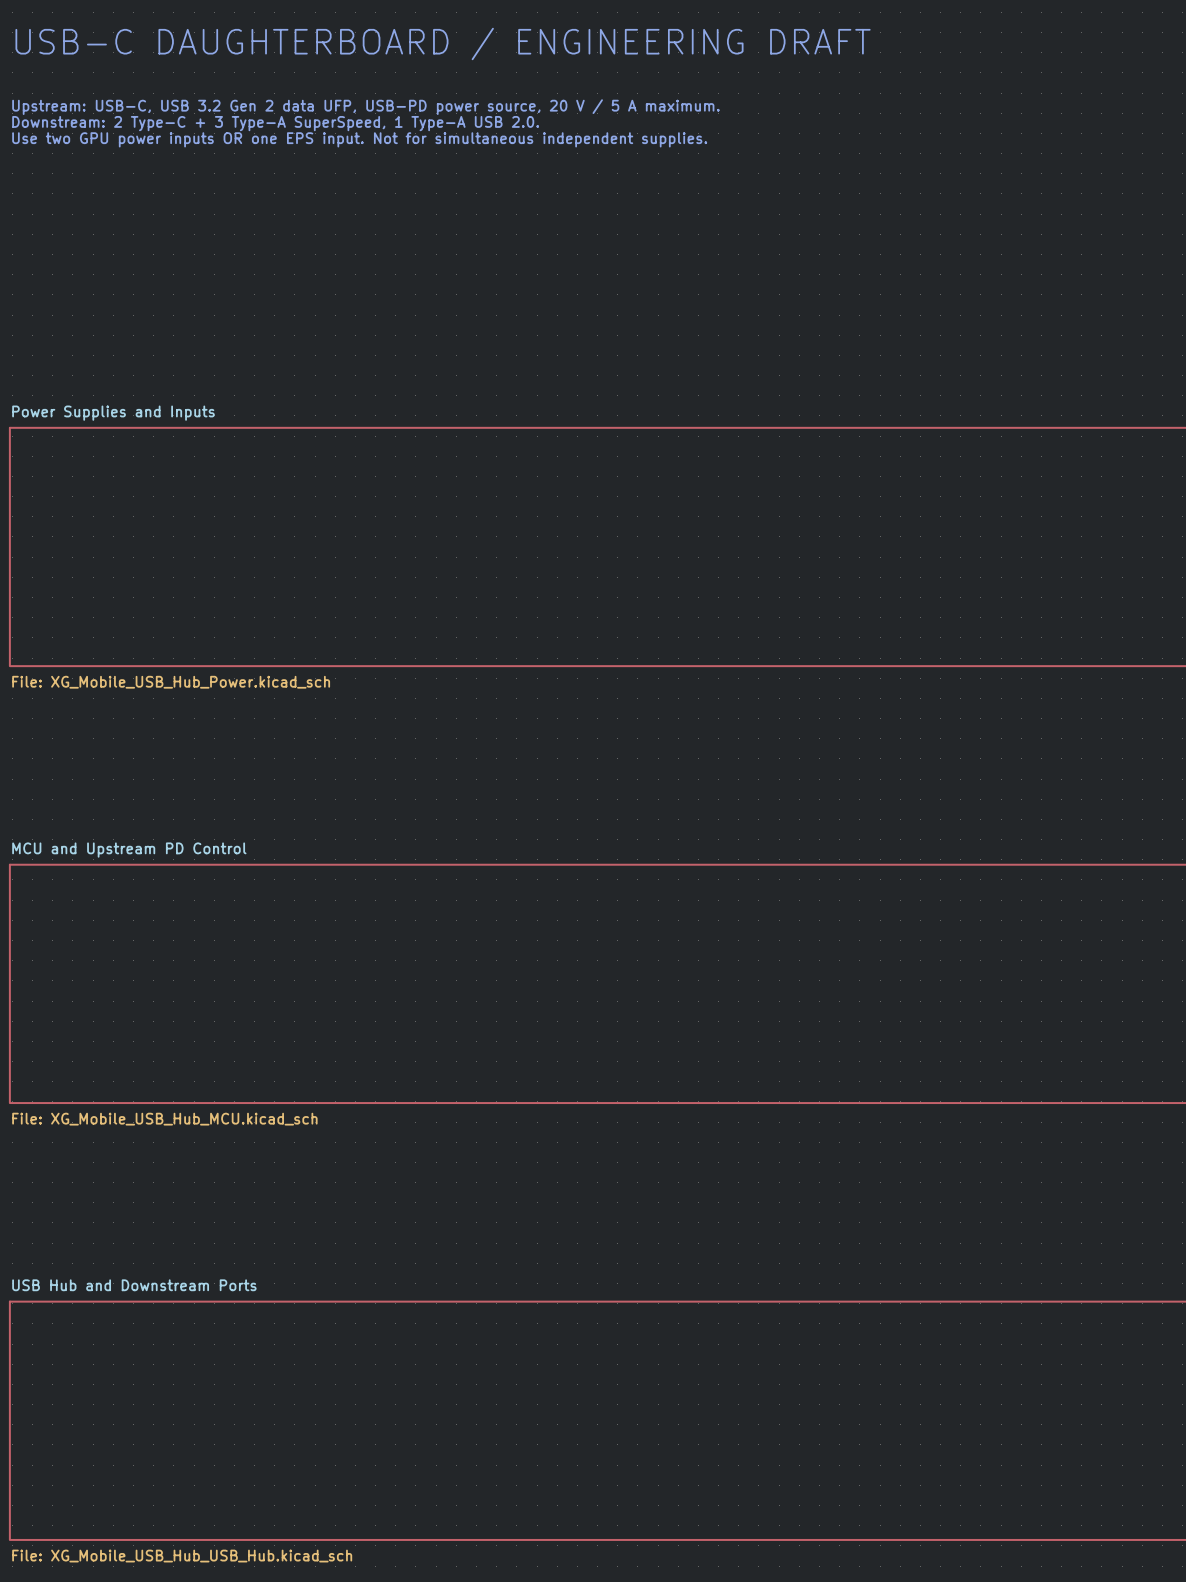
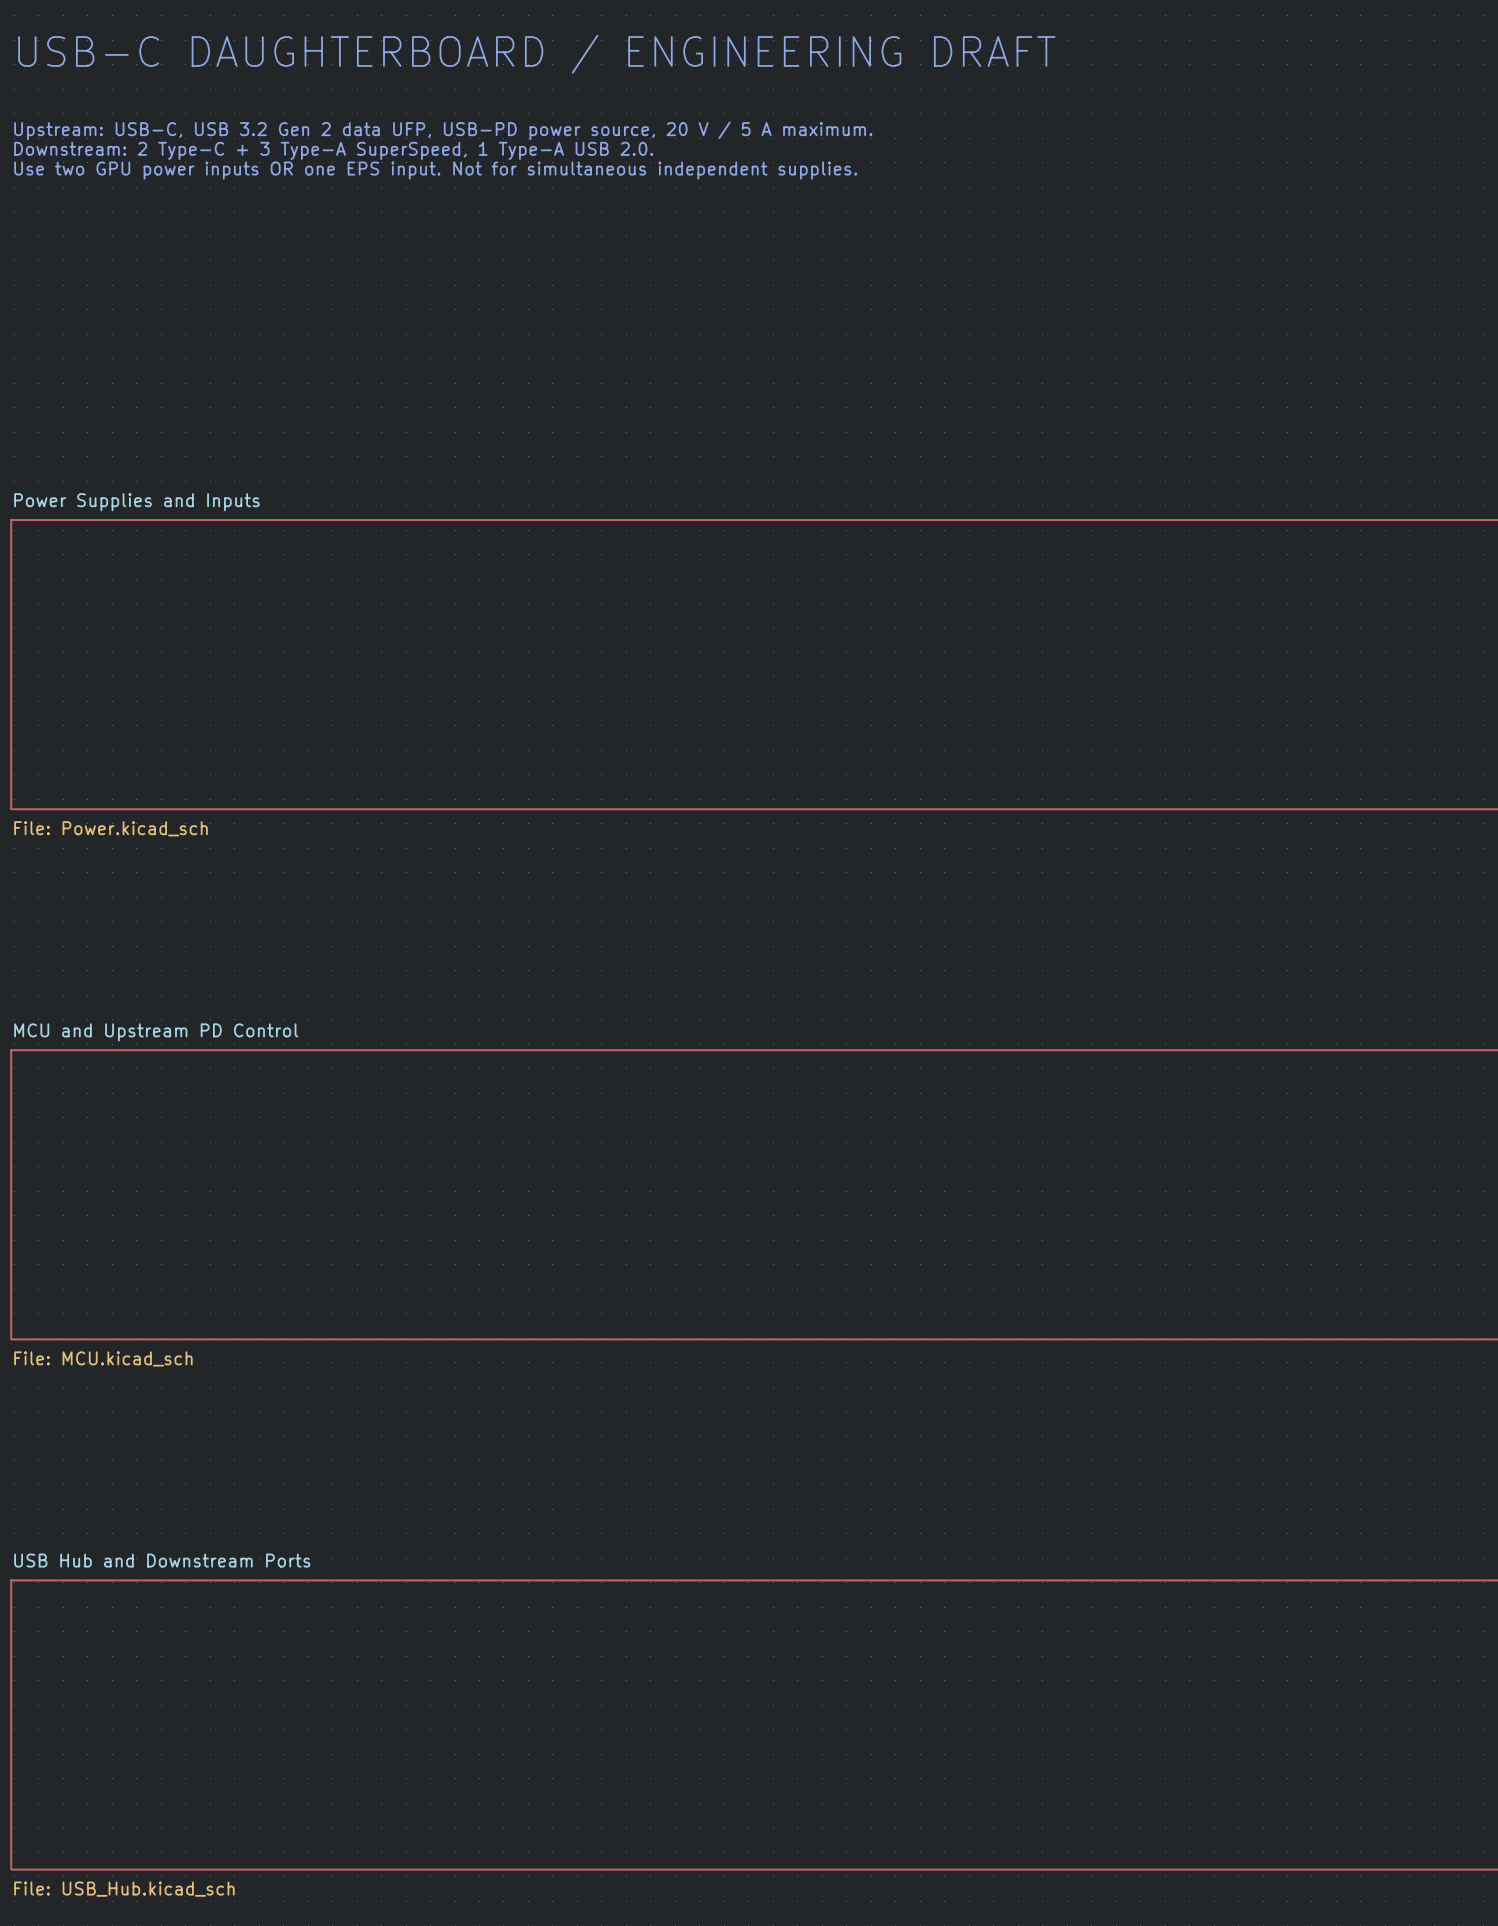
sheet Power Supplies and Inputs value: File: XG_Mobile_USB_Hub_Power.kicad_sch (171, 682) -> File: Power.kicad_sch (111, 828)
sheet MCU and Upstream PD Control value: File: XG_Mobile_USB_Hub_MCU.kicad_sch (164, 1119) -> File: MCU.kicad_sch (103, 1358)
sheet USB Hub and Downstream Ports value: File: XG_Mobile_USB_Hub_USB_Hub.kicad_sch (182, 1556) -> File: USB_Hub.kicad_sch (124, 1889)

